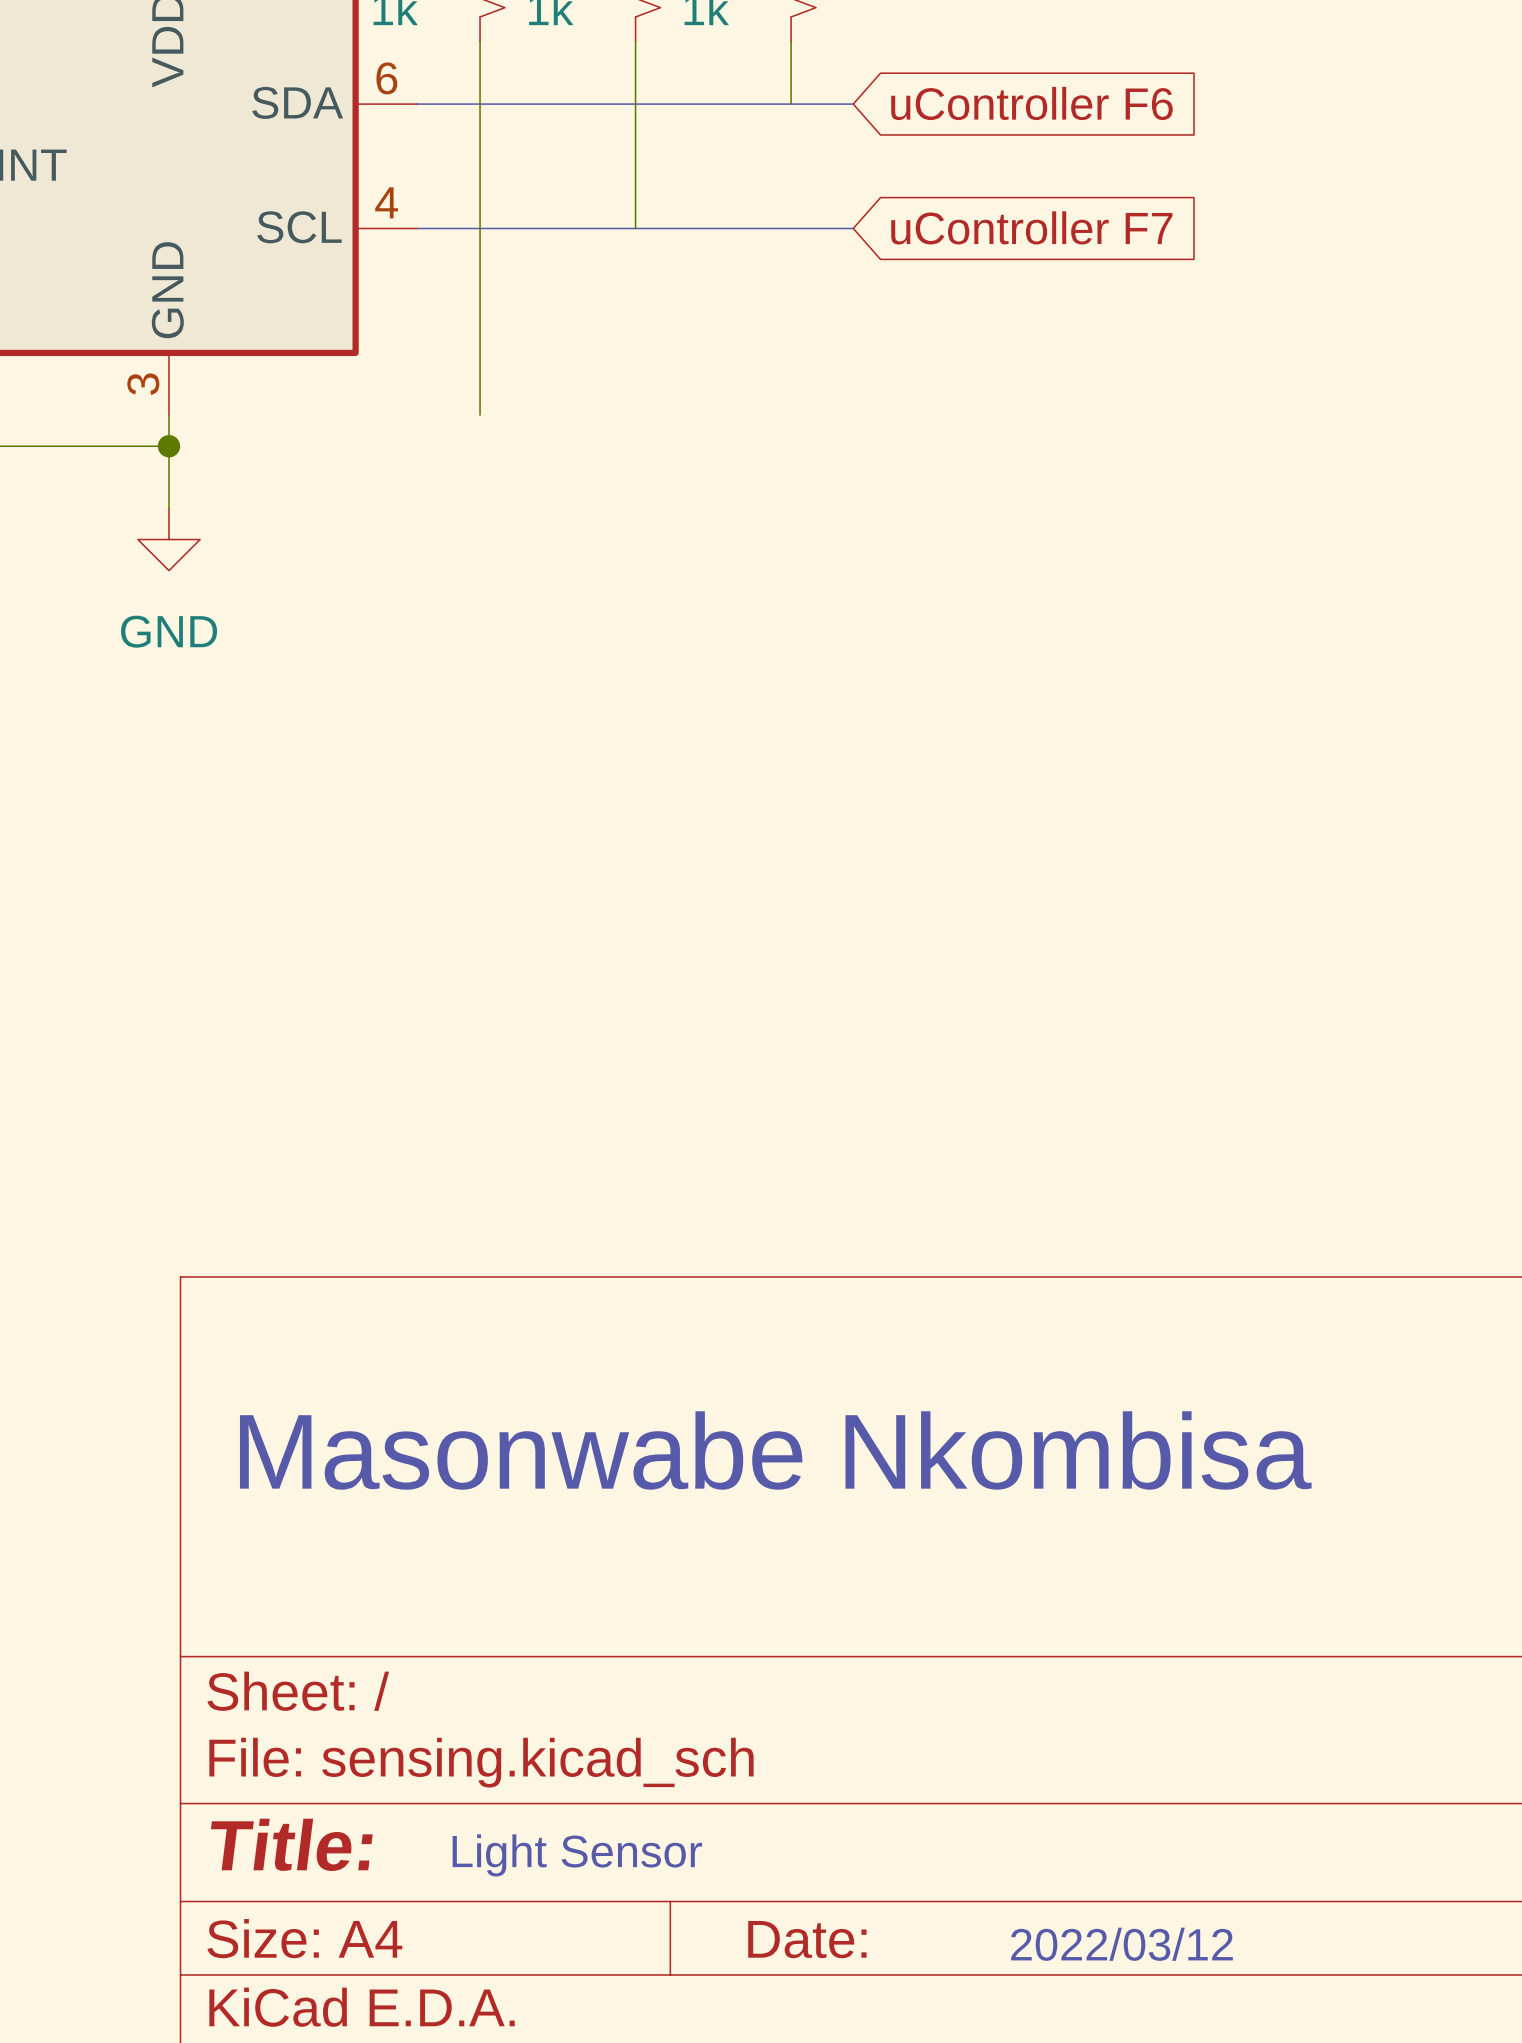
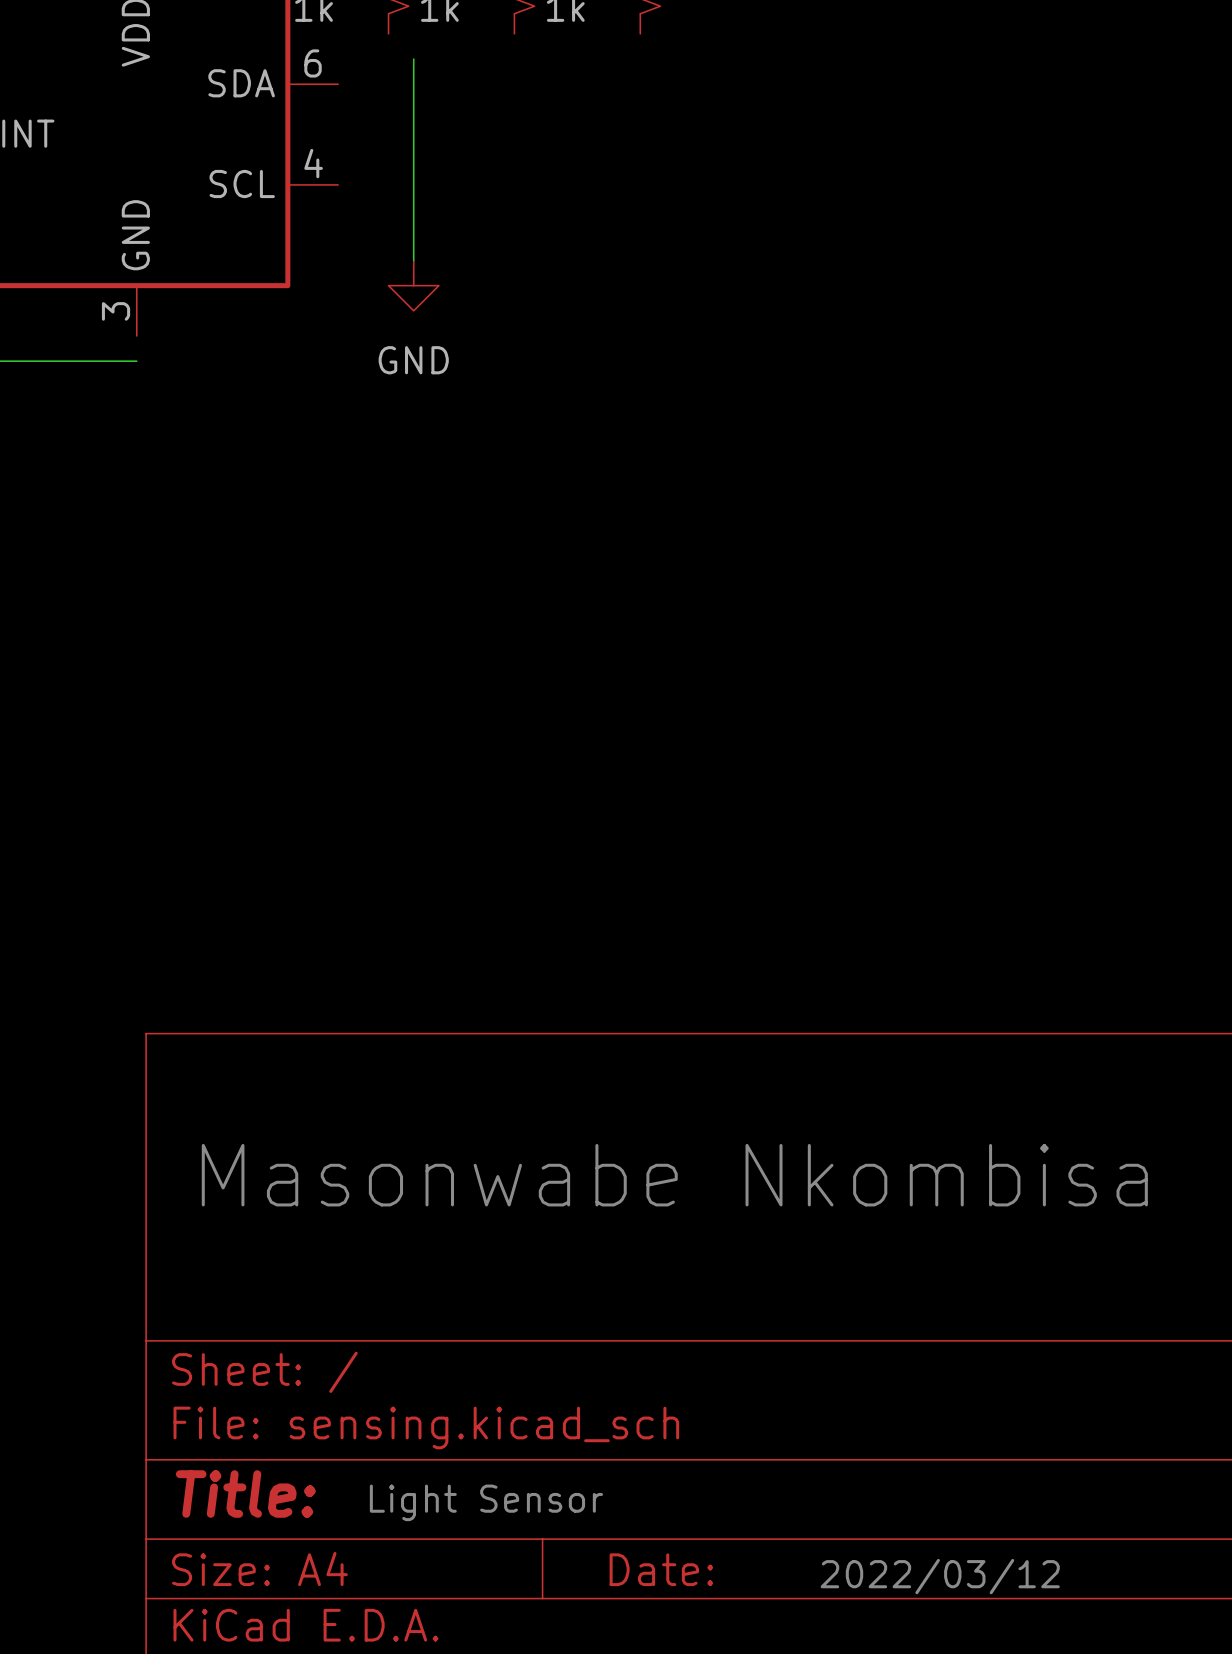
wire: (480, 41) (480, 415) -> none
wire: (635, 41) (635, 228) -> none
wire: (791, 41) (791, 104) -> none
wire: none -> (413, 59) (413, 260)
global label: uController F6 (1031, 103) -> none
bus: (417, 104) (853, 104) -> none
global label: uController F7 (1031, 227) -> none
bus: (417, 228) (853, 228) -> none
wire: (168, 415) (168, 508) -> none
junction: (168, 446) -> none
power symbol position: GND (168, 539) -> GND (413, 285)

